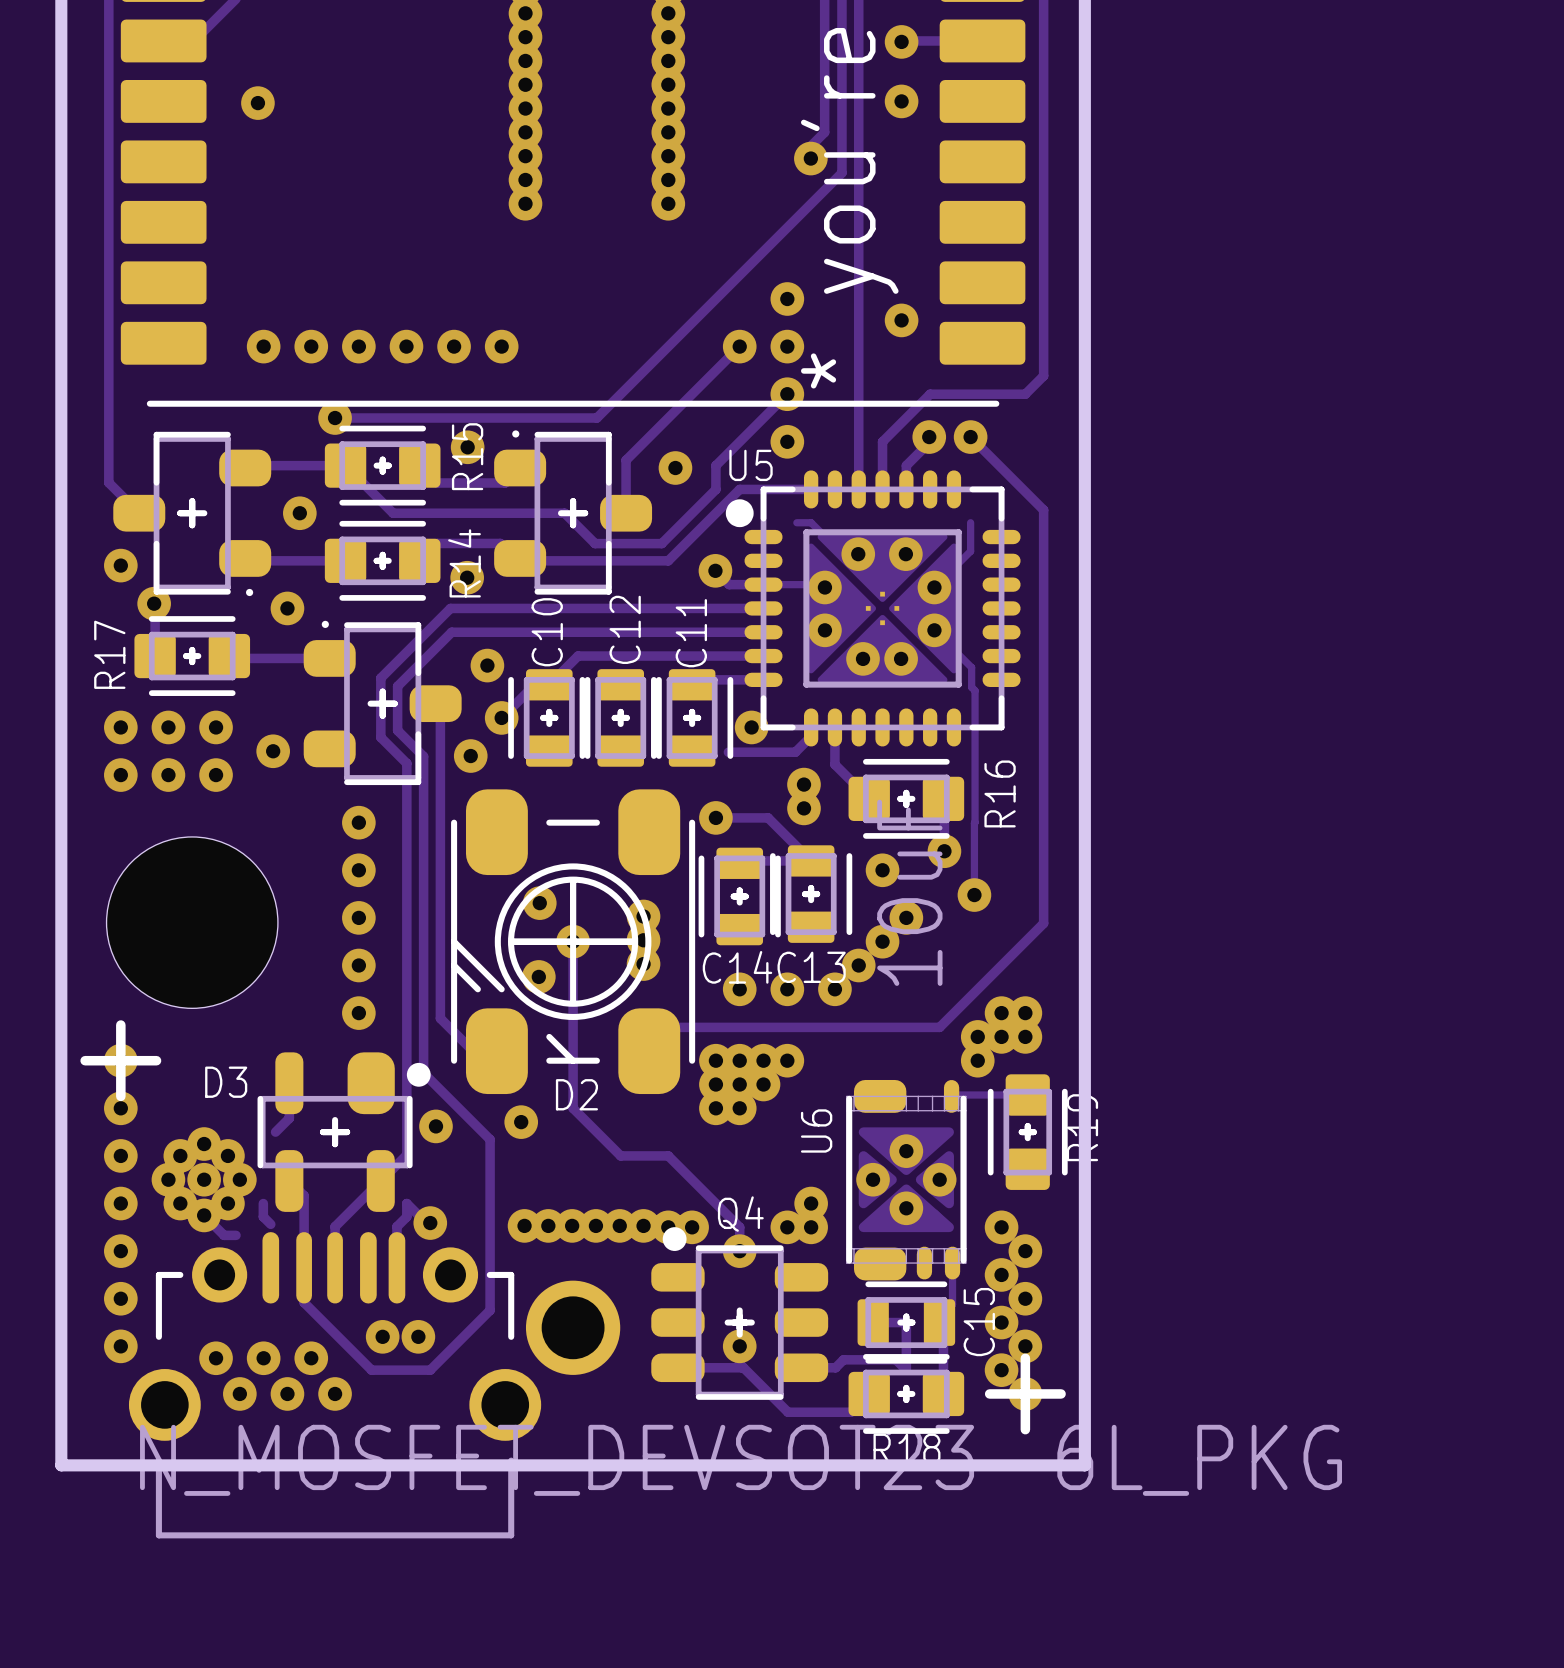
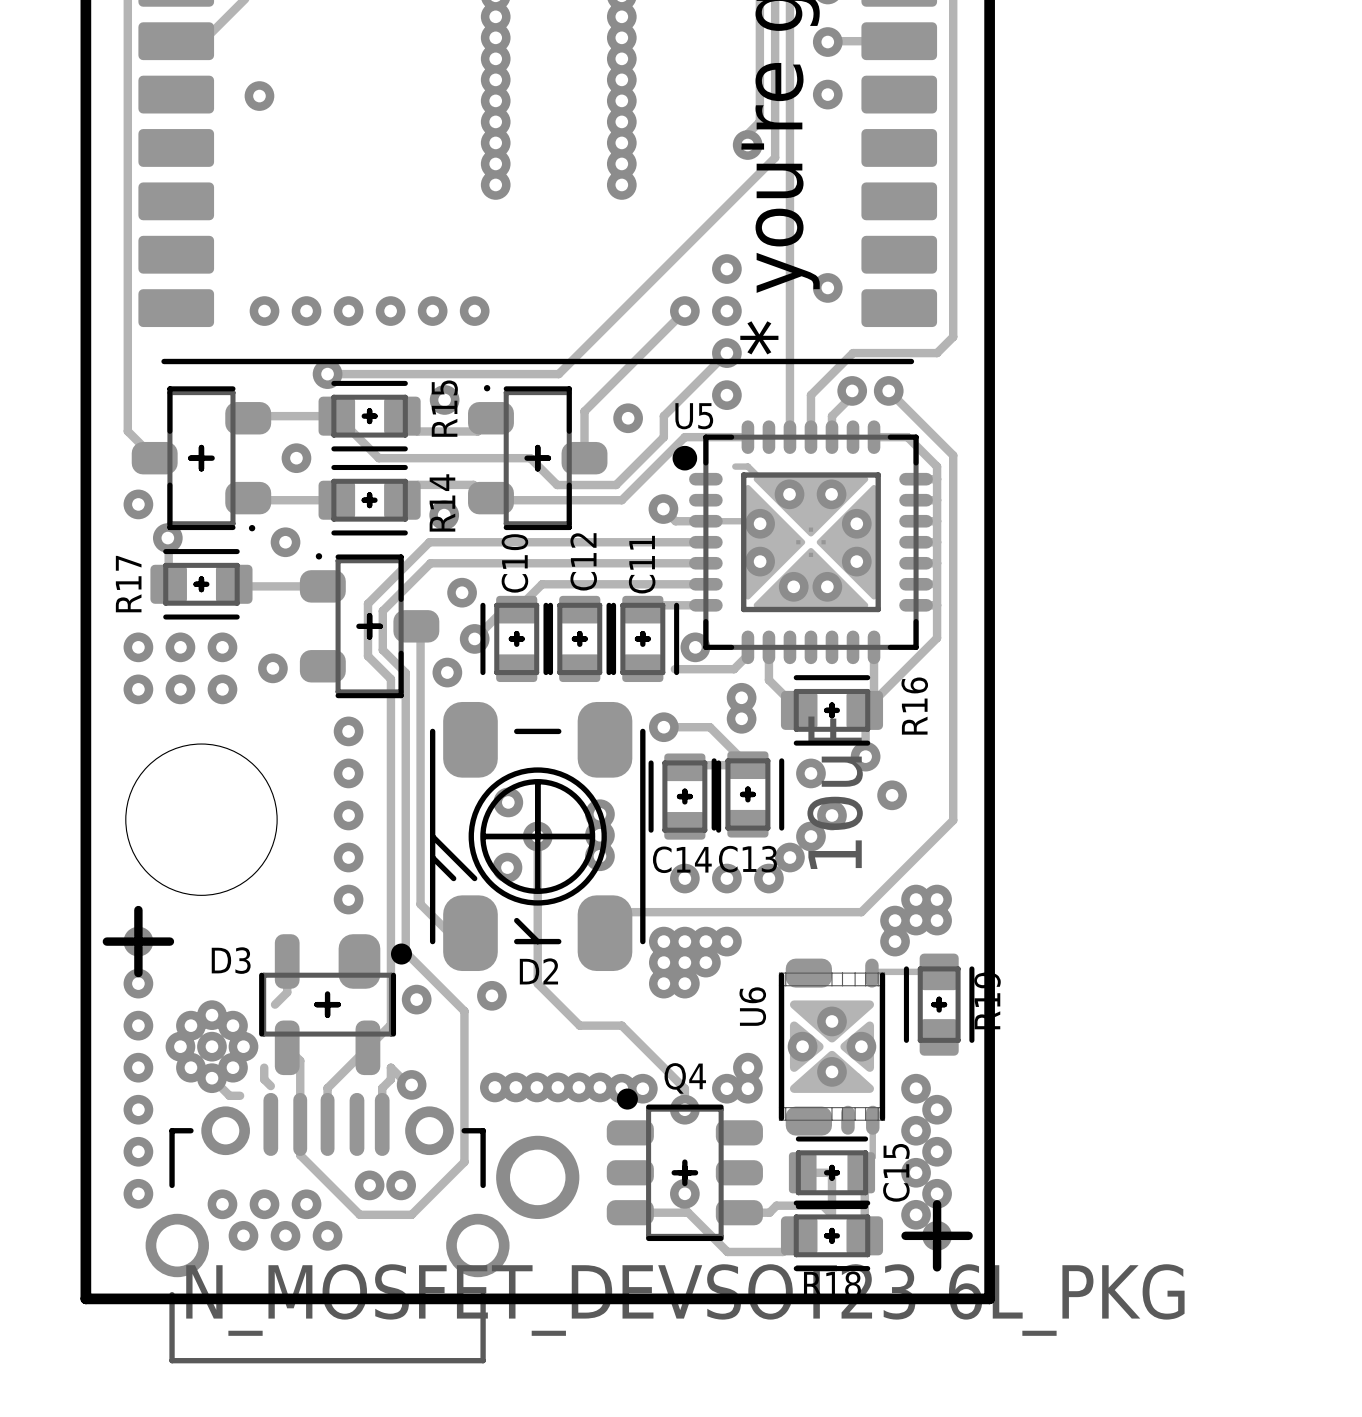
track: none -> (874, 437) (907, 437) (937, 466) (937, 638) (874, 701) (874, 647)
track: (970, 522) (970, 551) (934, 587) -> none
track: (934, 630) (971, 667) (971, 687) (975, 690) (975, 822) -> none
track: (974, 823) (974, 895) -> none

